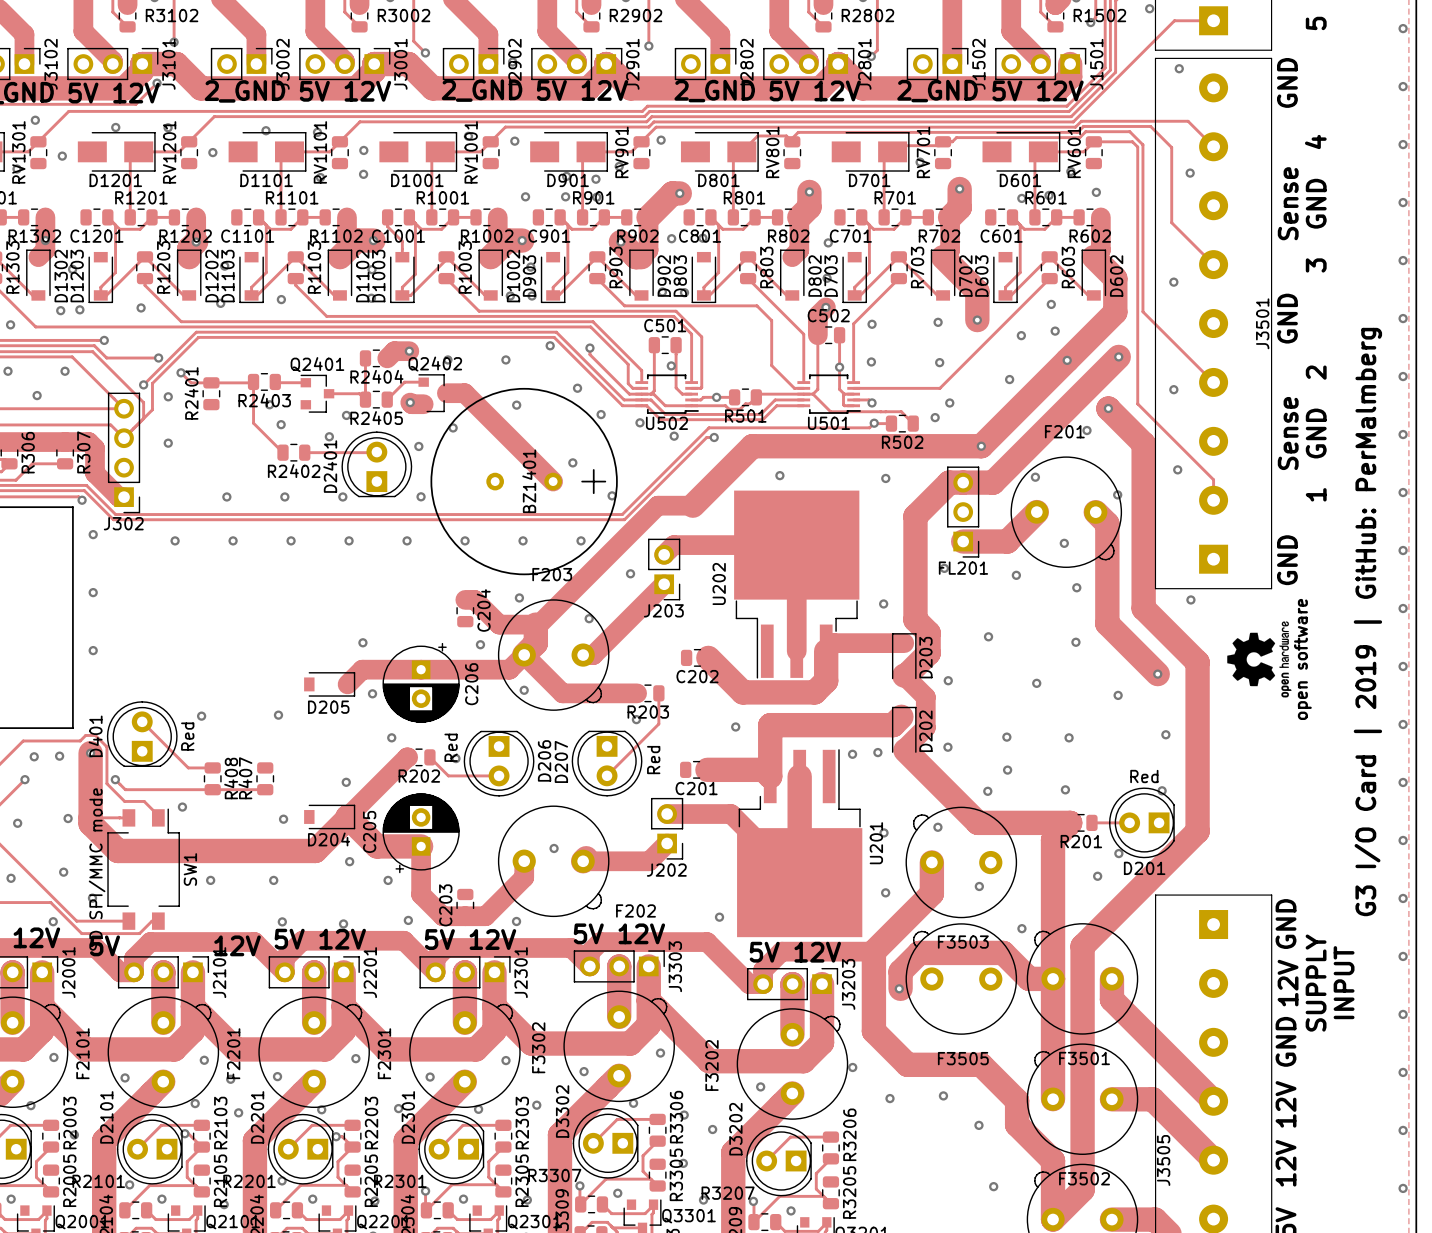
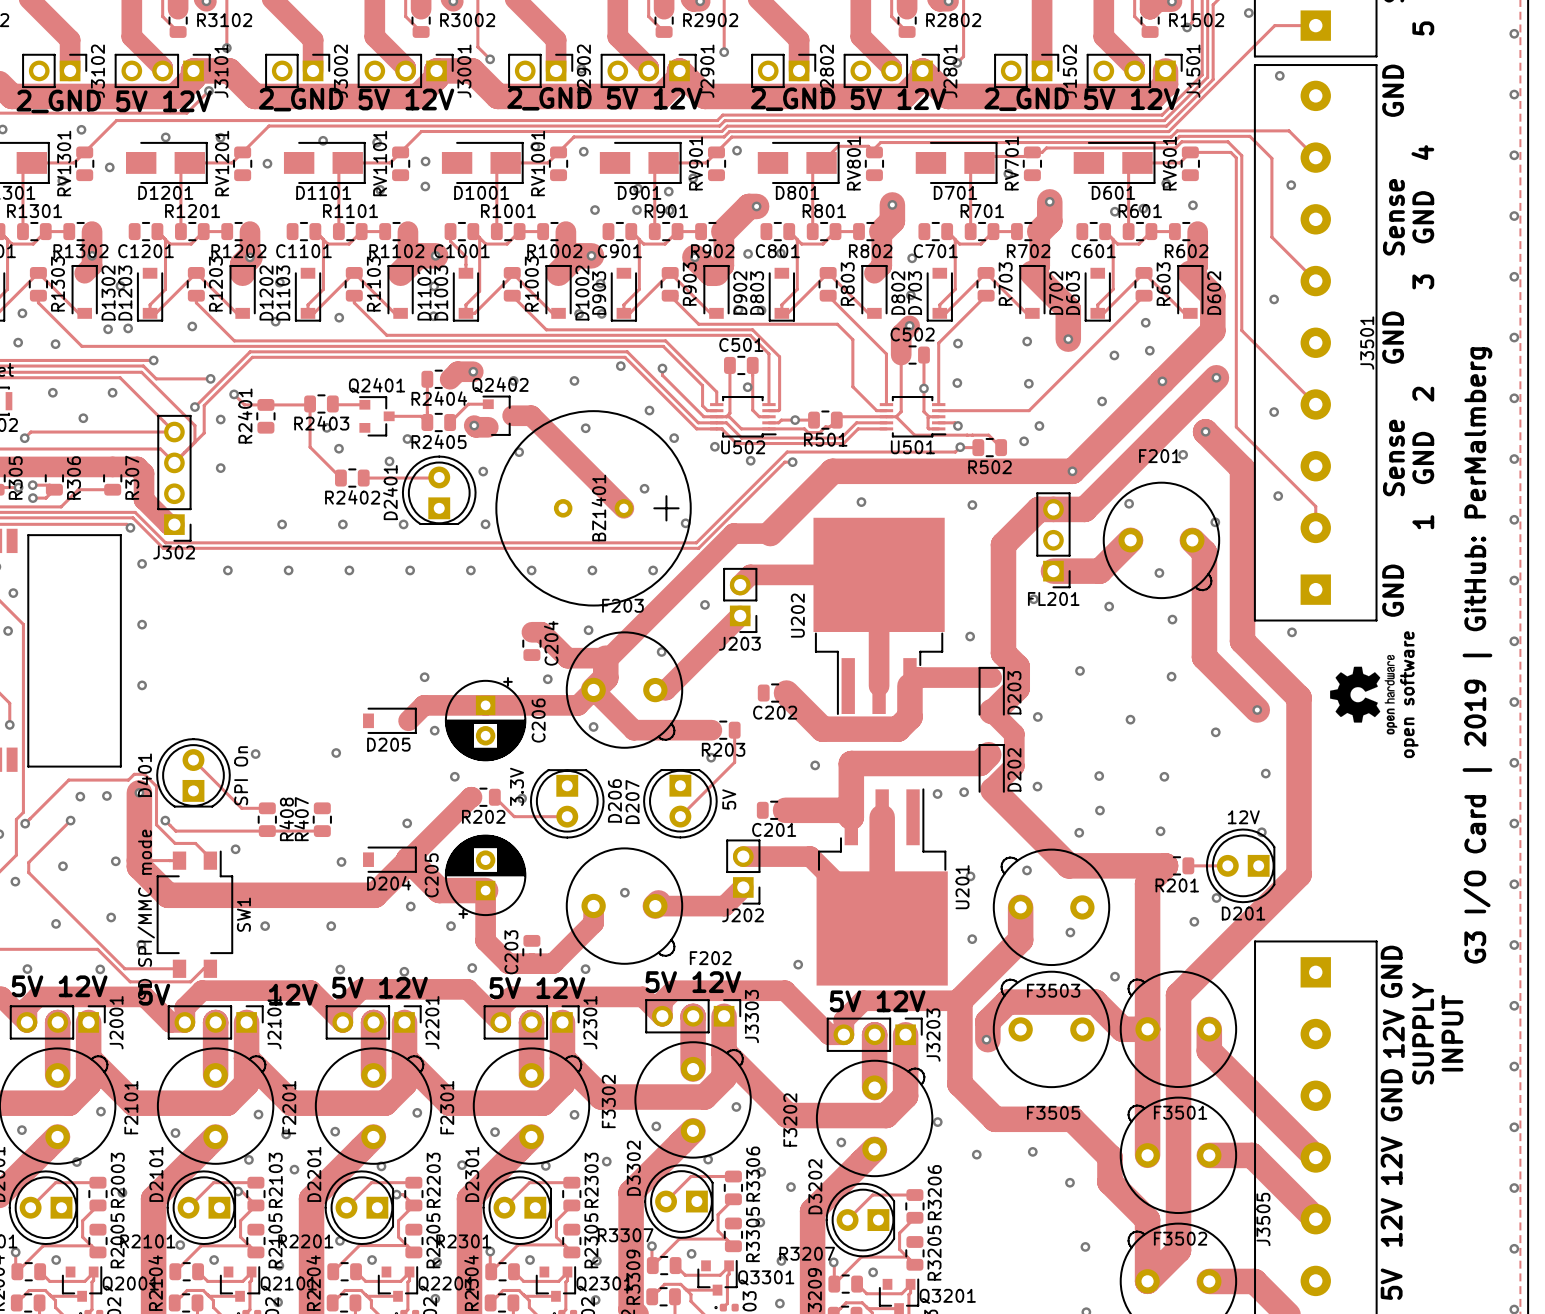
D401 value: Red (187, 736) -> SPI On (241, 775)
D206 value: Red (451, 747) -> 3.3V (517, 786)
D207 value: Red (653, 760) -> 5V (729, 799)
D201 value: Red (1144, 776) -> 12V (1243, 817)

